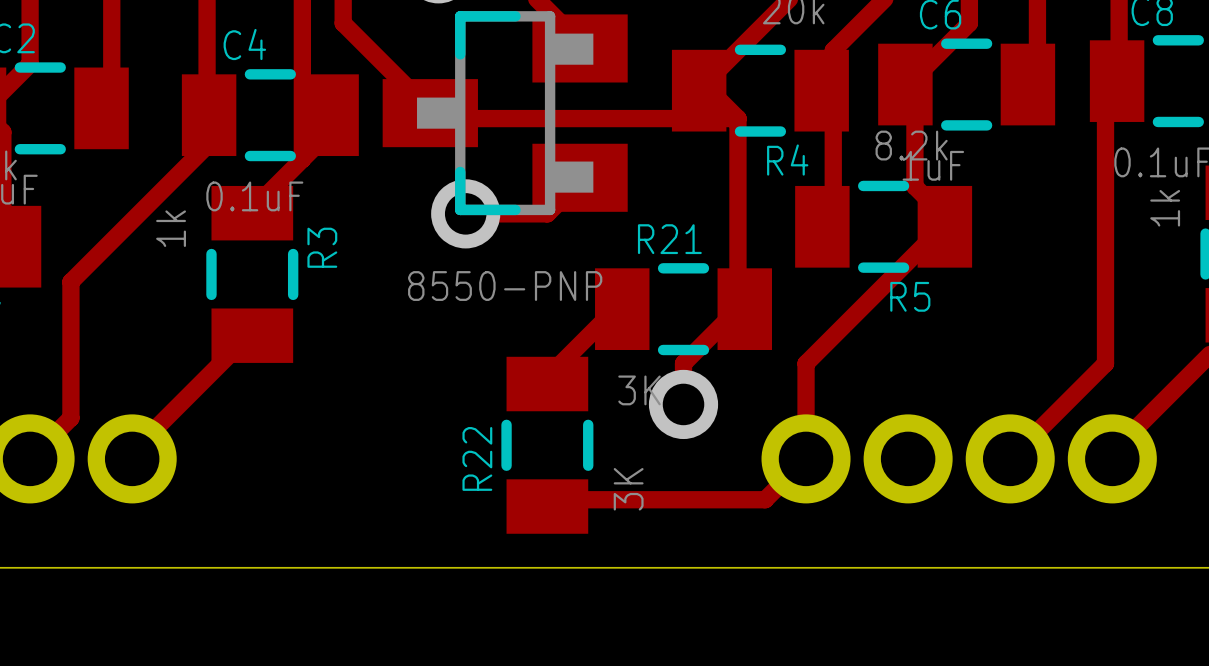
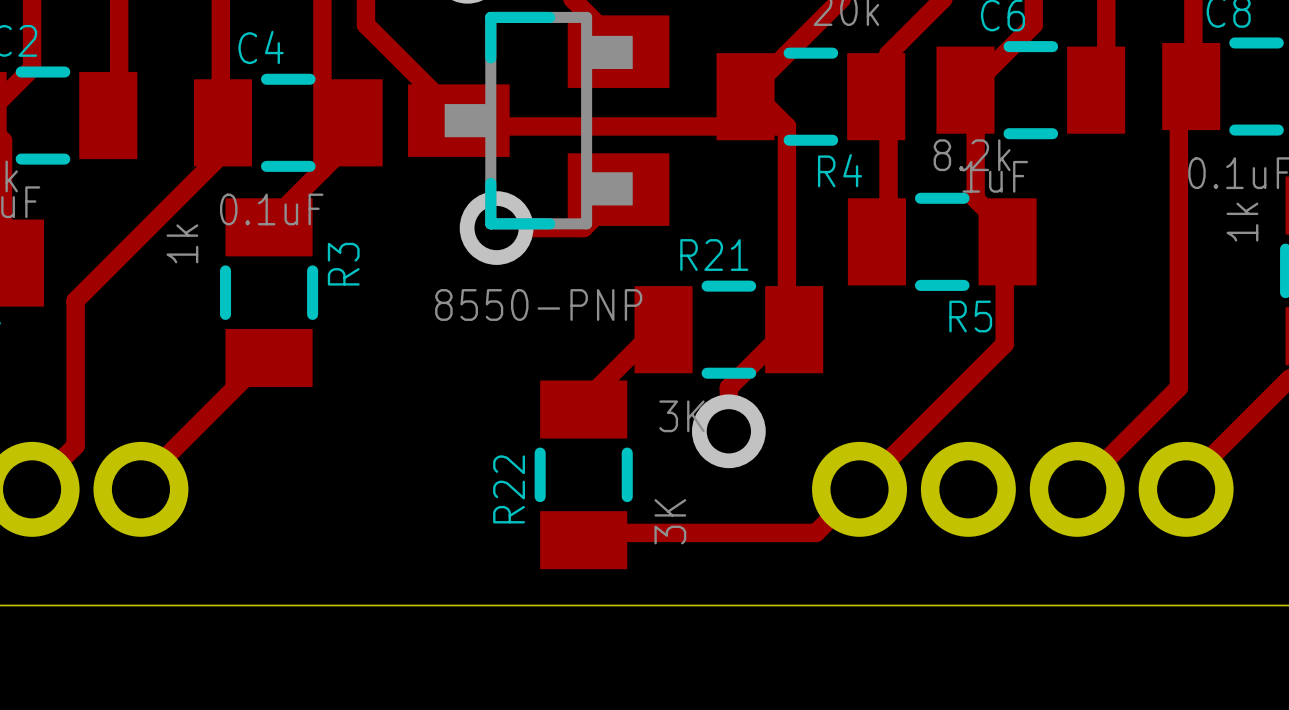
track: (942, 227) (806, 363) (806, 458) -> (1004, 242) (1004, 344) (859, 489)

